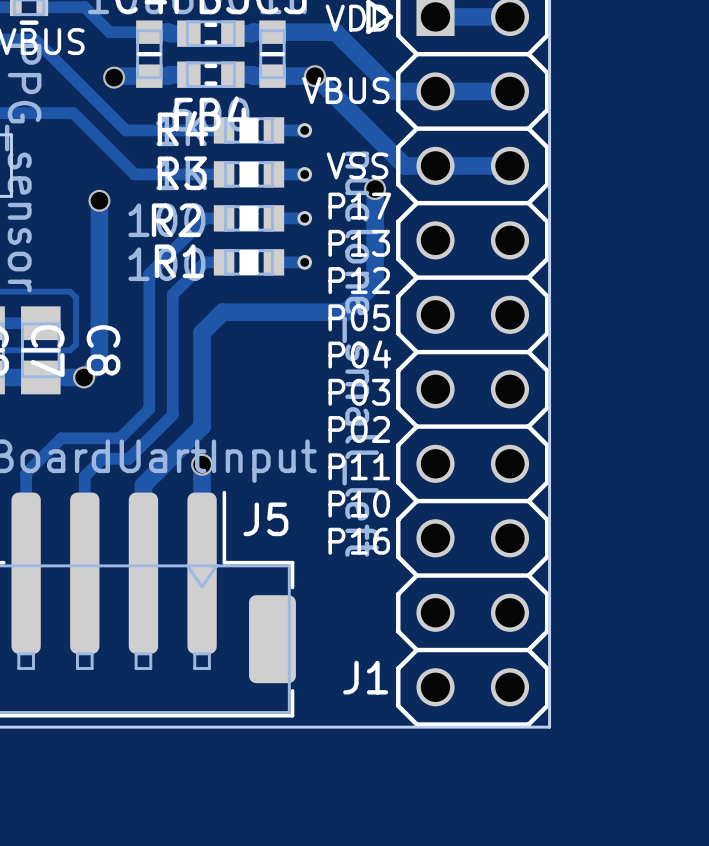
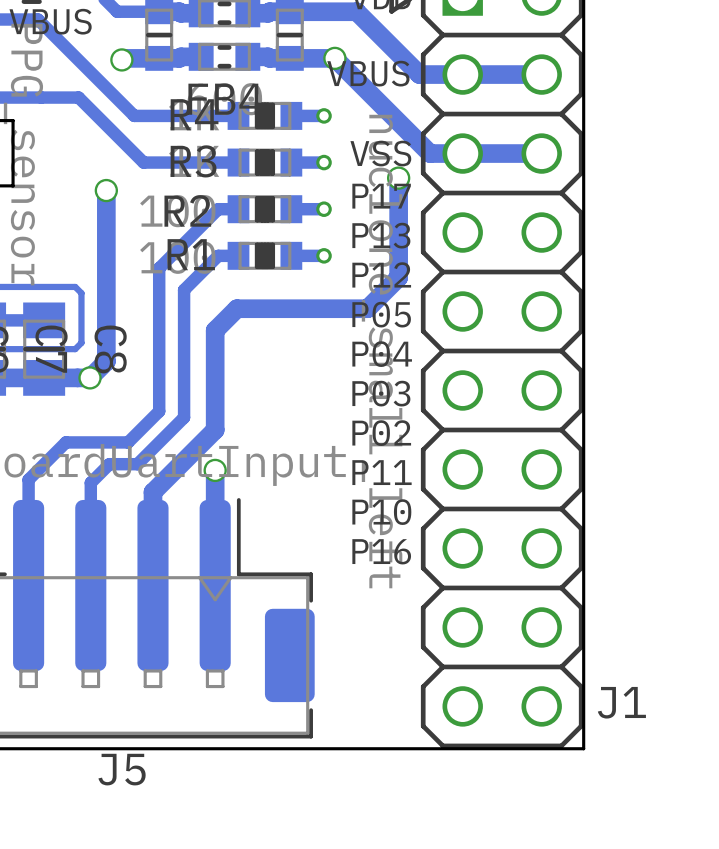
J5 name position: J5 (265, 519) -> J5 (122, 769)
J1 name position: J1 (365, 677) -> J1 (621, 702)

